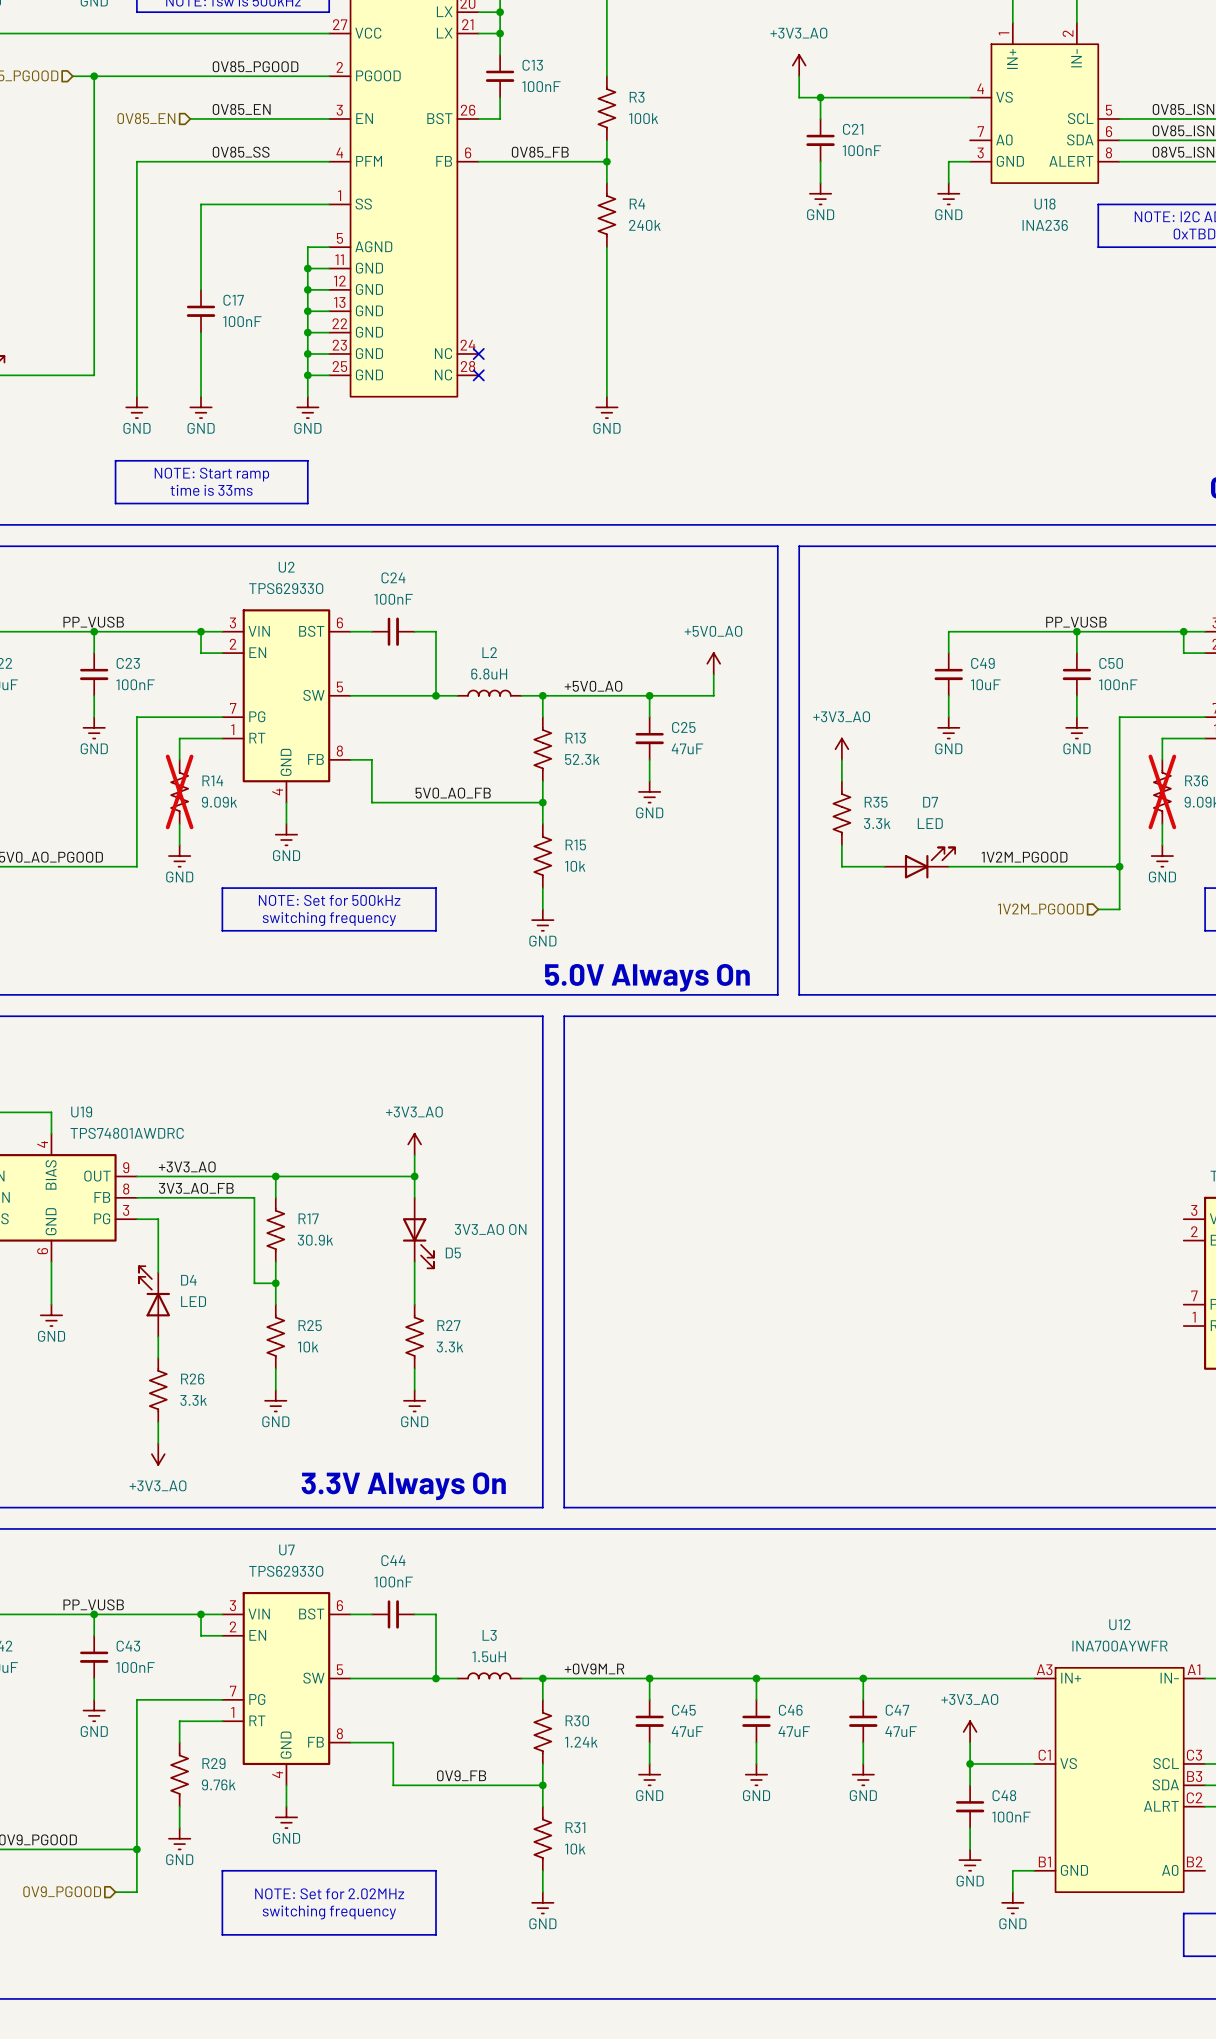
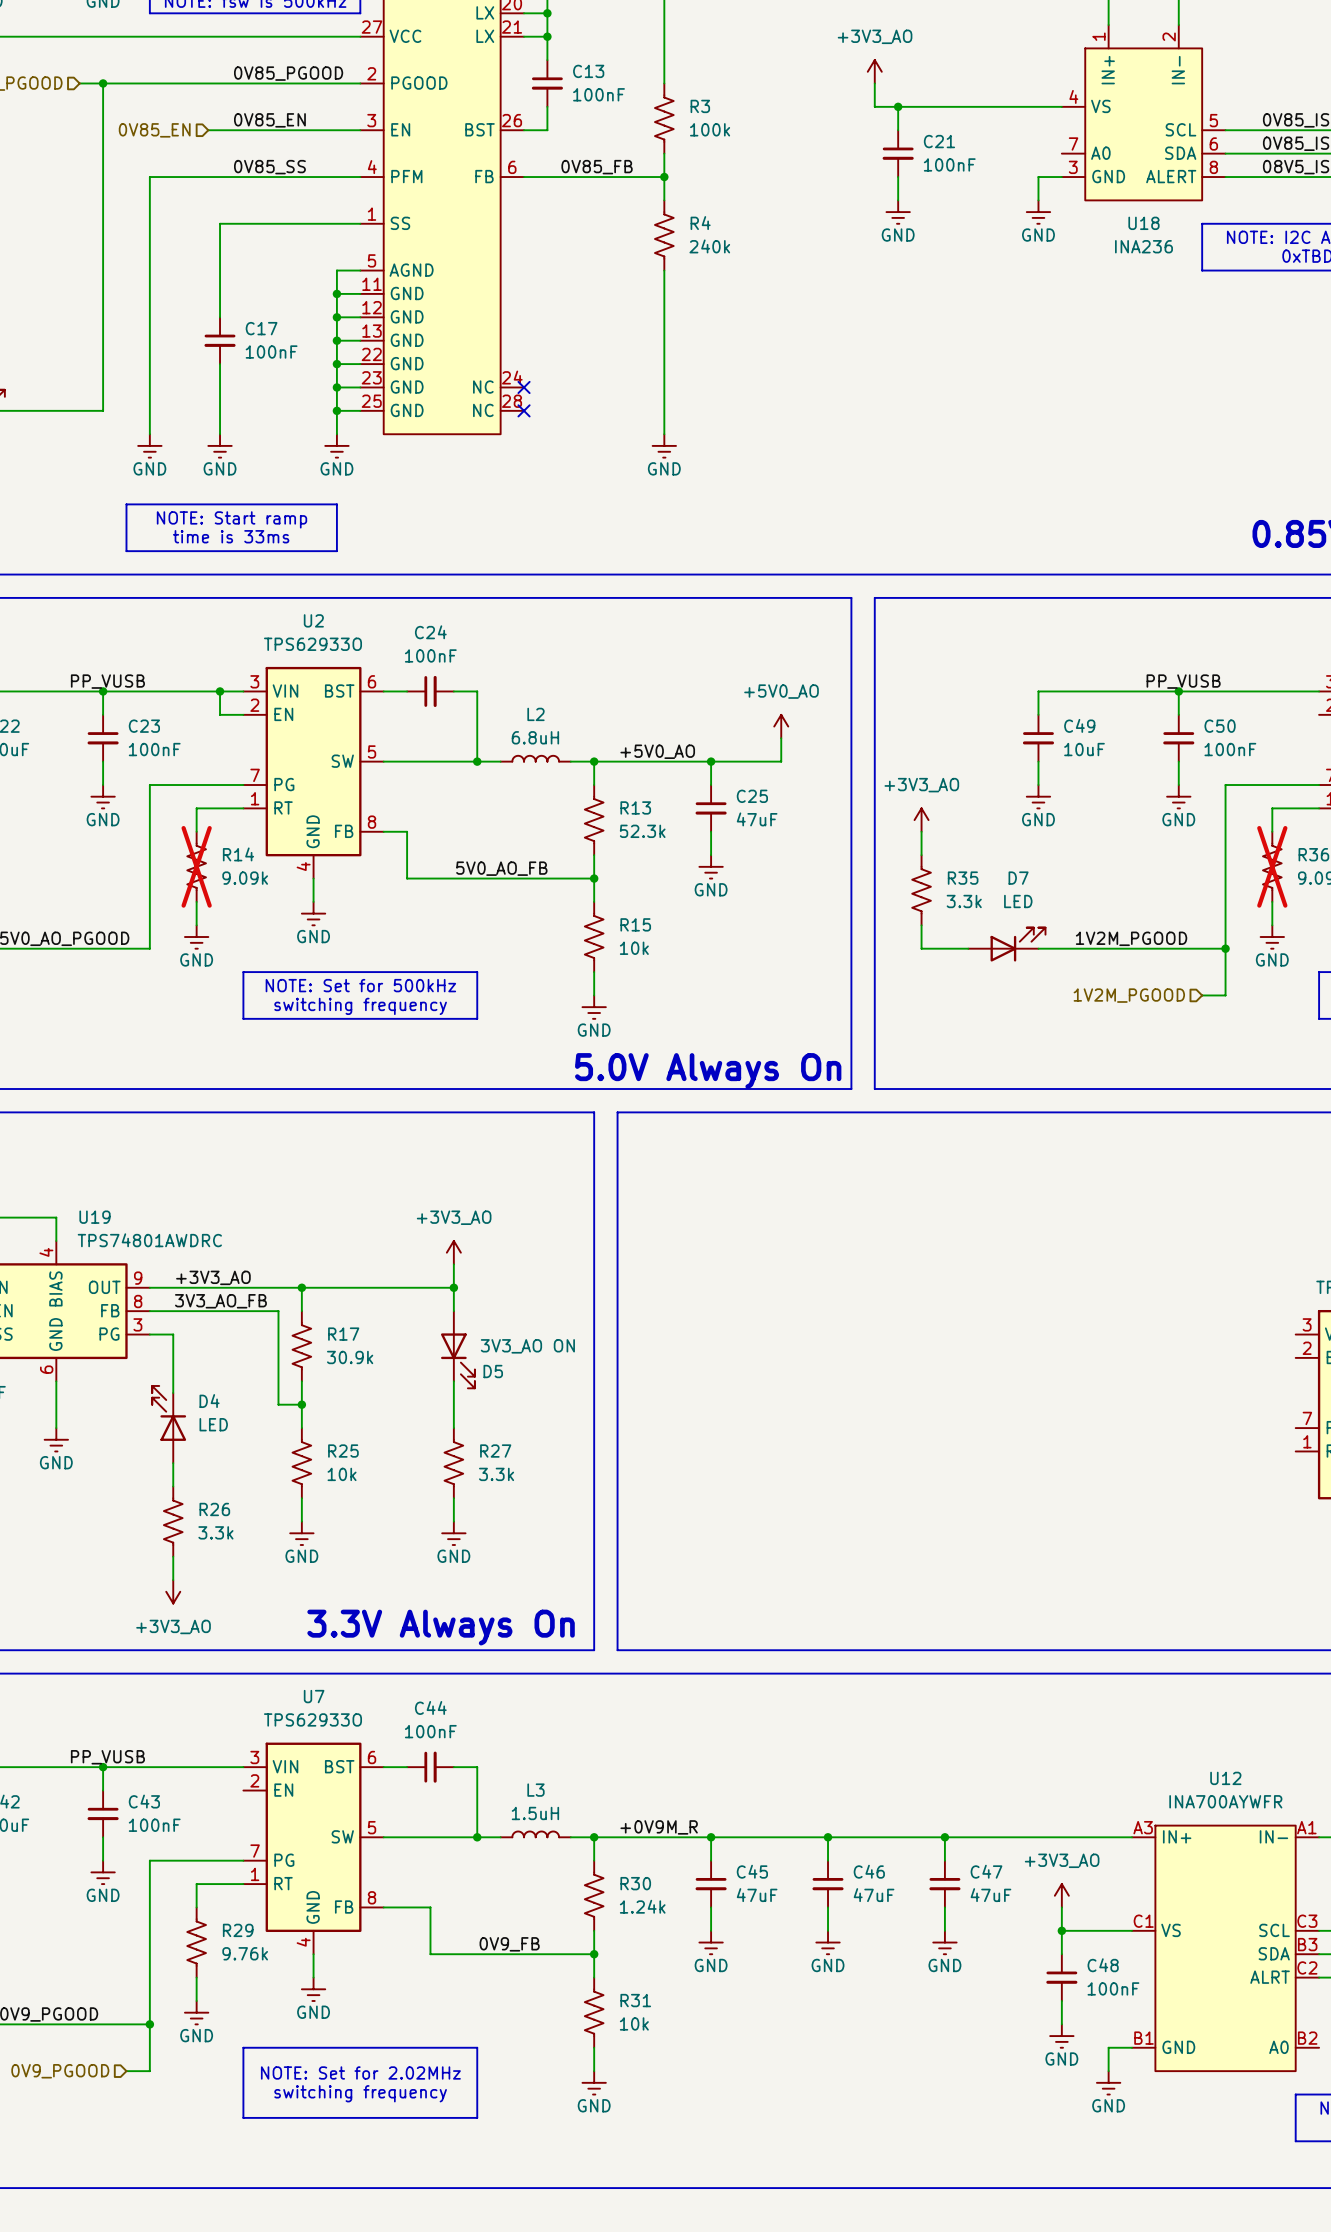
wire: (1183, 631) (1183, 653) (1205, 653) -> none
junction: (1183, 631) -> none
wire: (201, 1614) (201, 1635) (222, 1635) -> none
junction: (201, 1614) -> none

